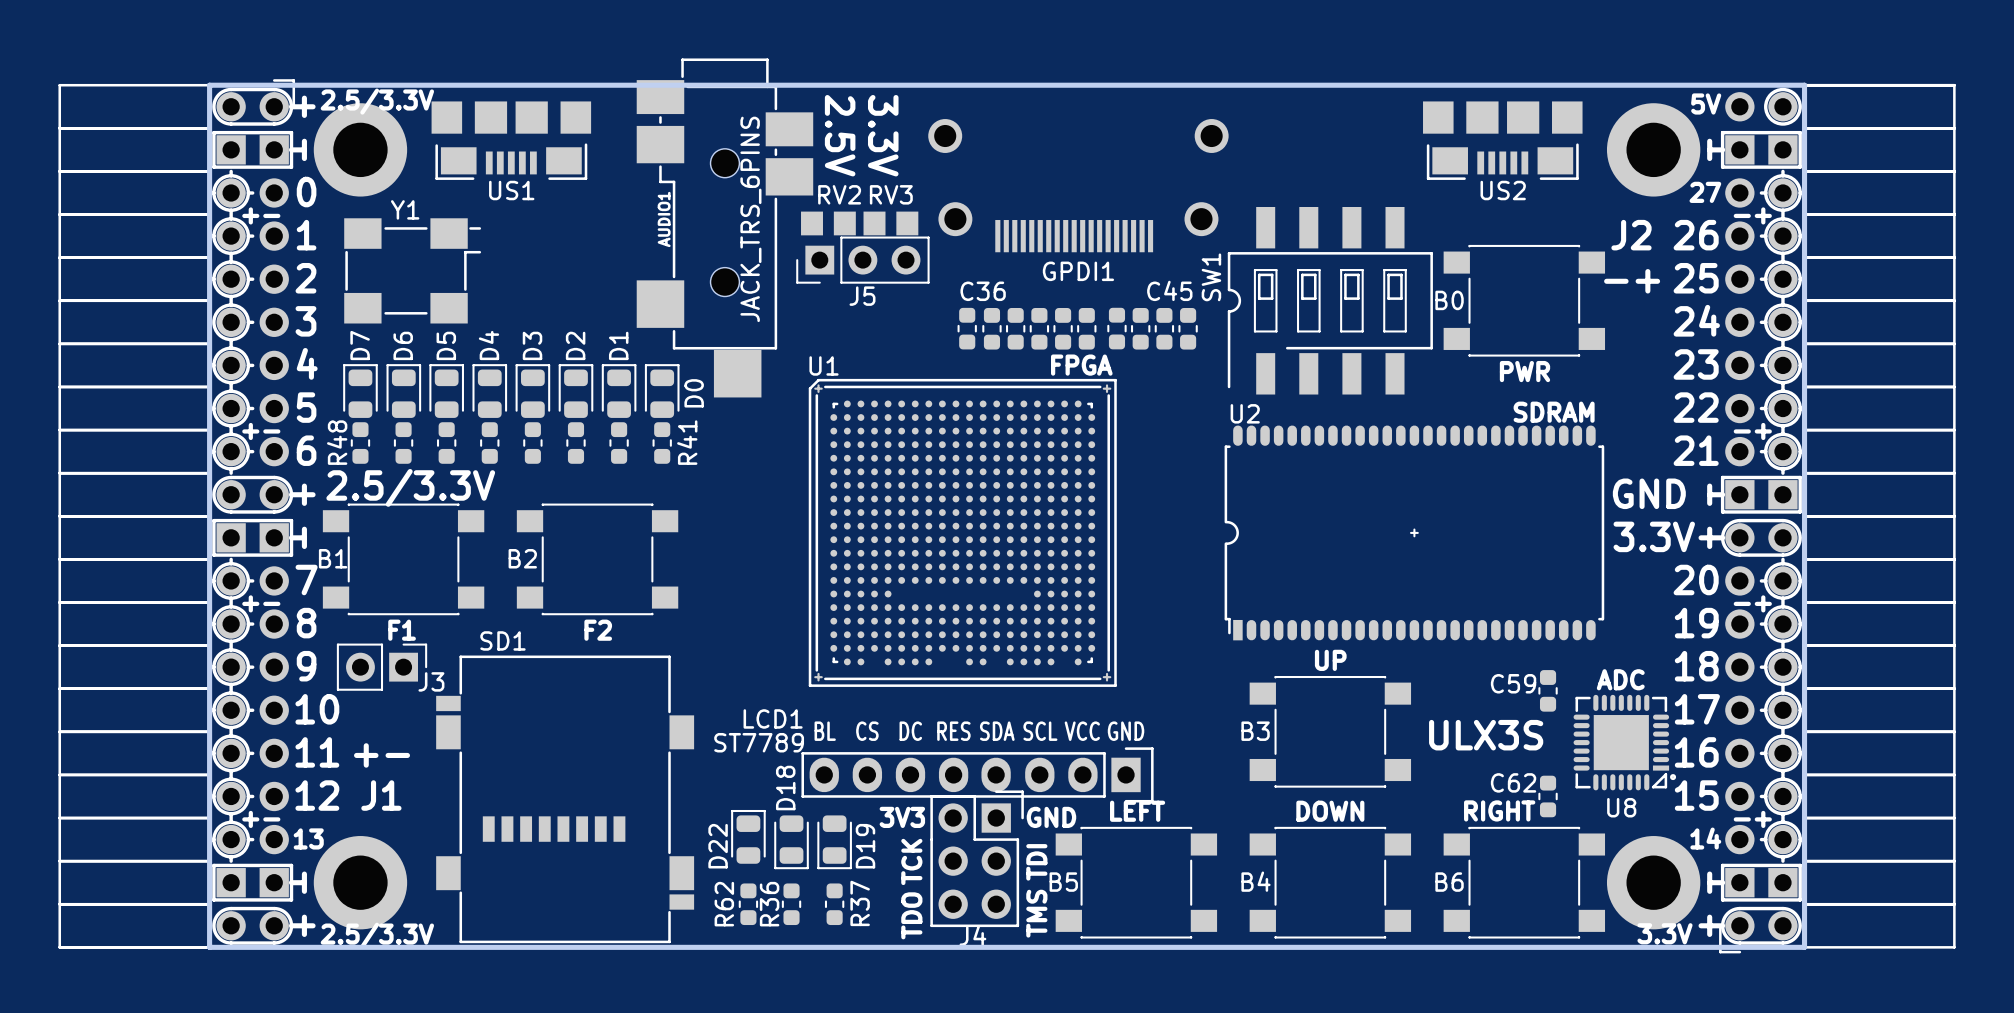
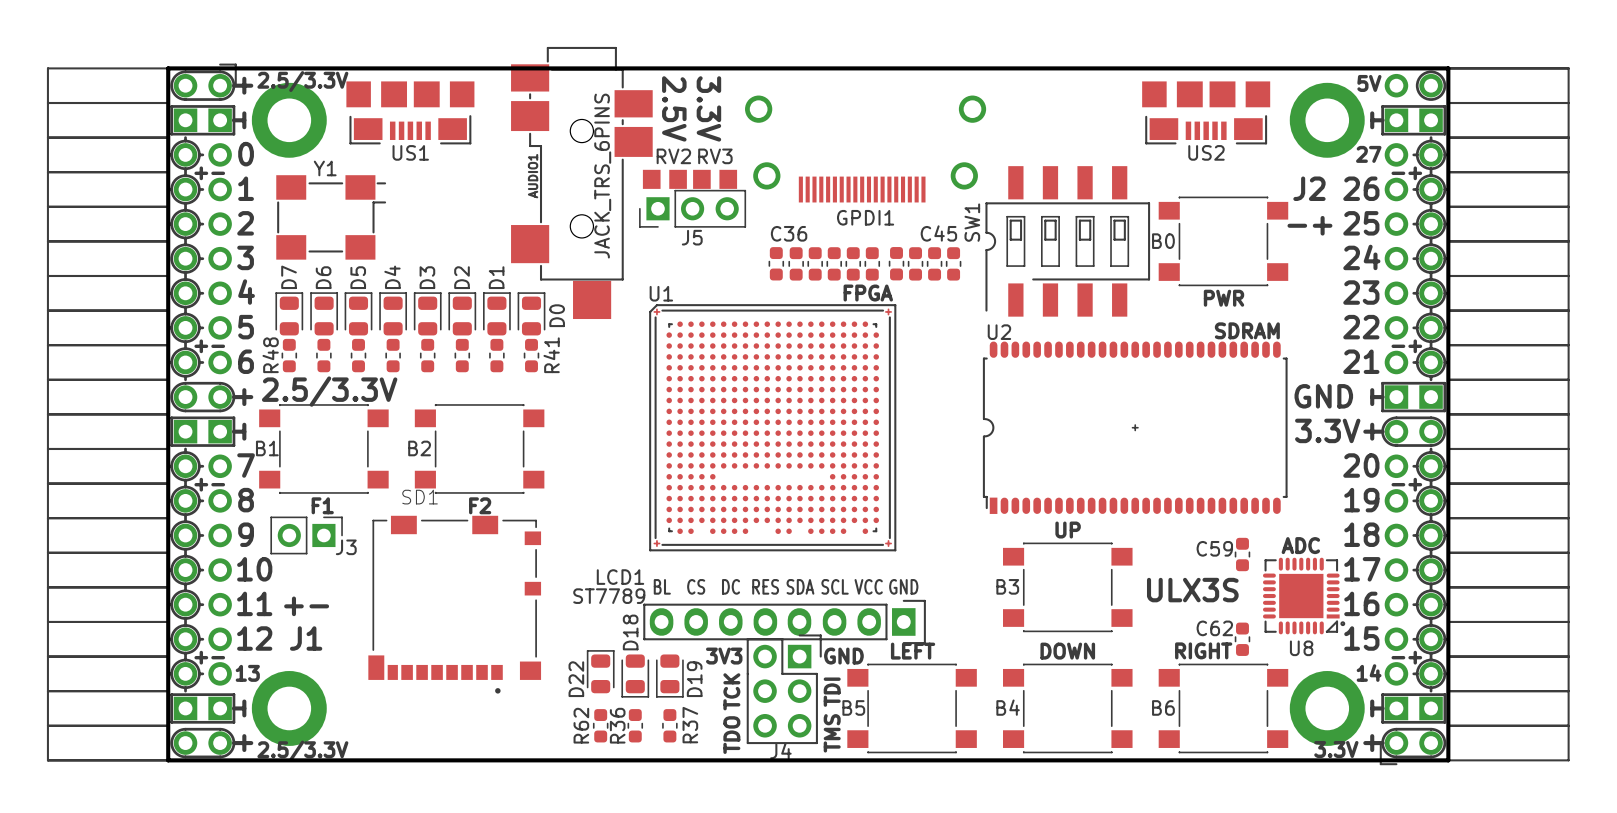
SD1 footprint: [436, 655, 695, 944] -> [368, 515, 542, 694]

